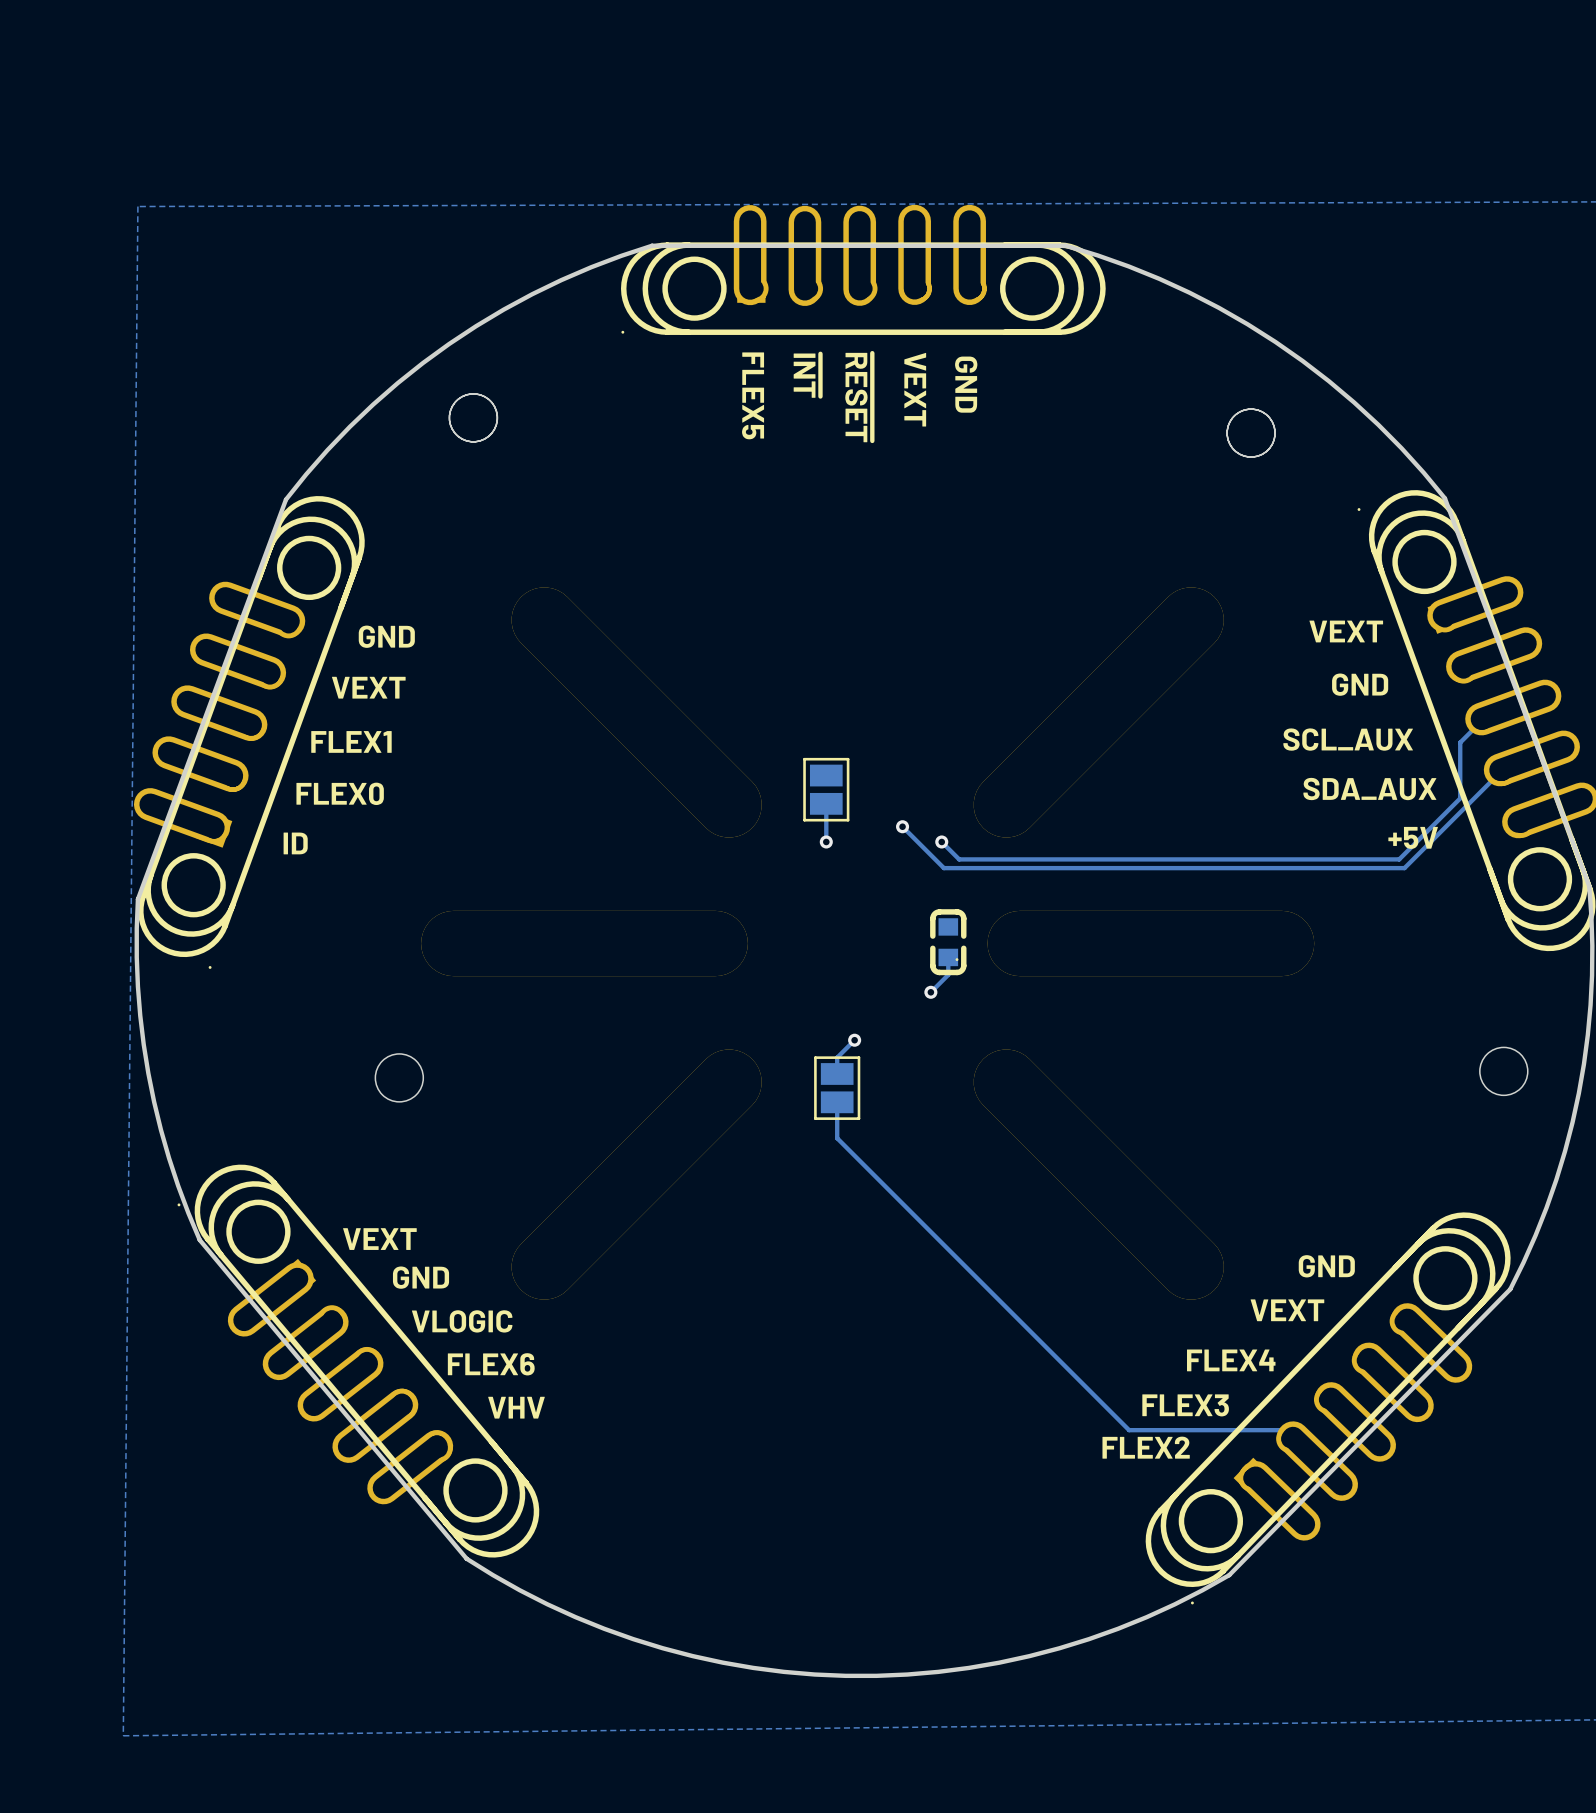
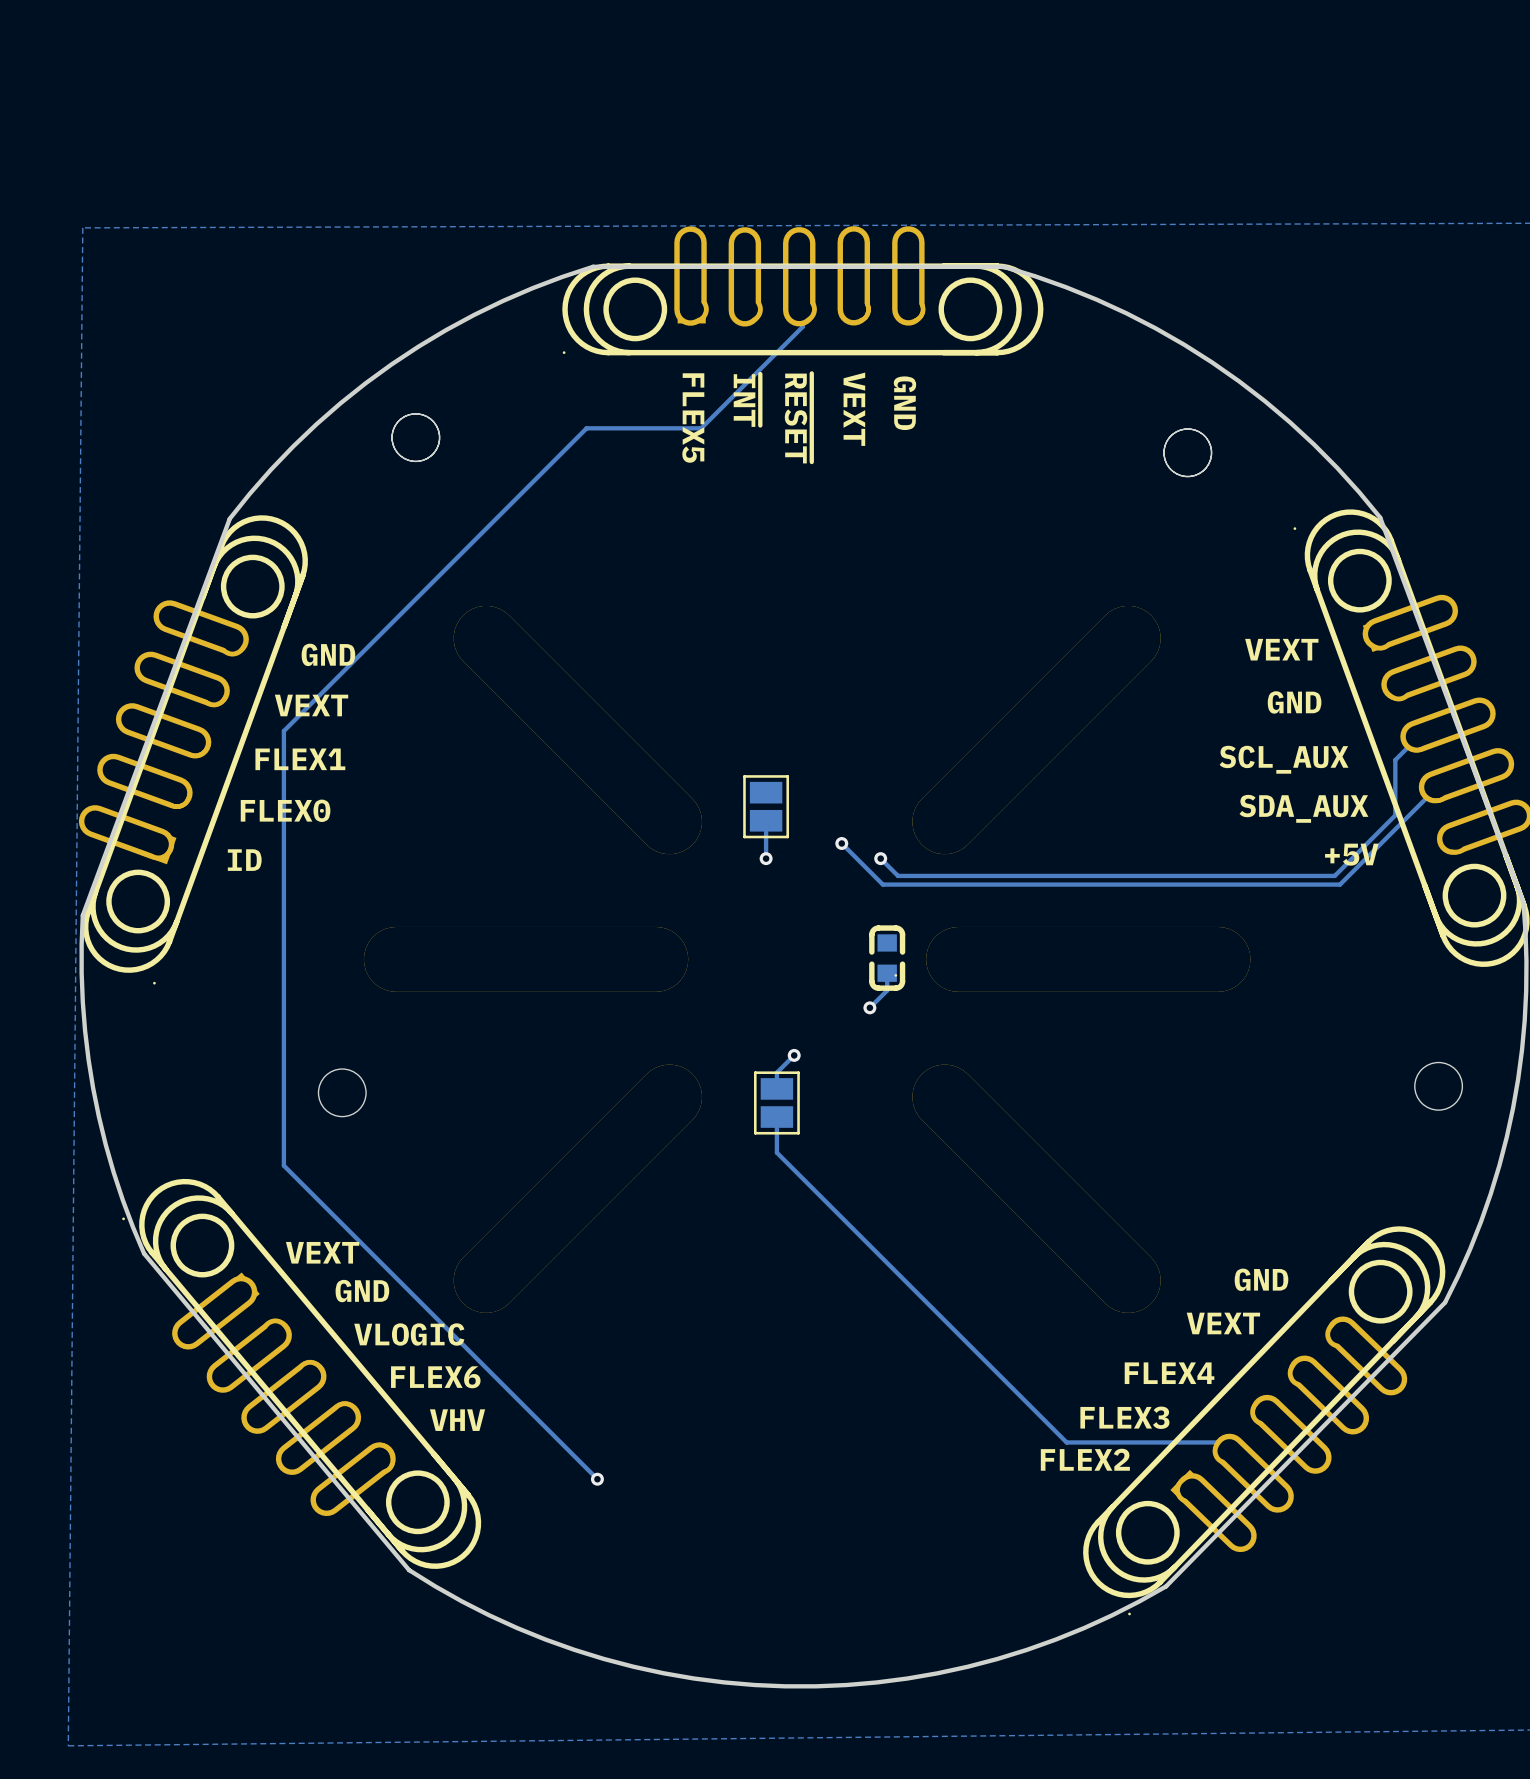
track: none -> (802, 309) (802, 326) (701, 428) (586, 428) (283, 731) (283, 1165) (597, 1479)
via: none -> (597, 1479)

